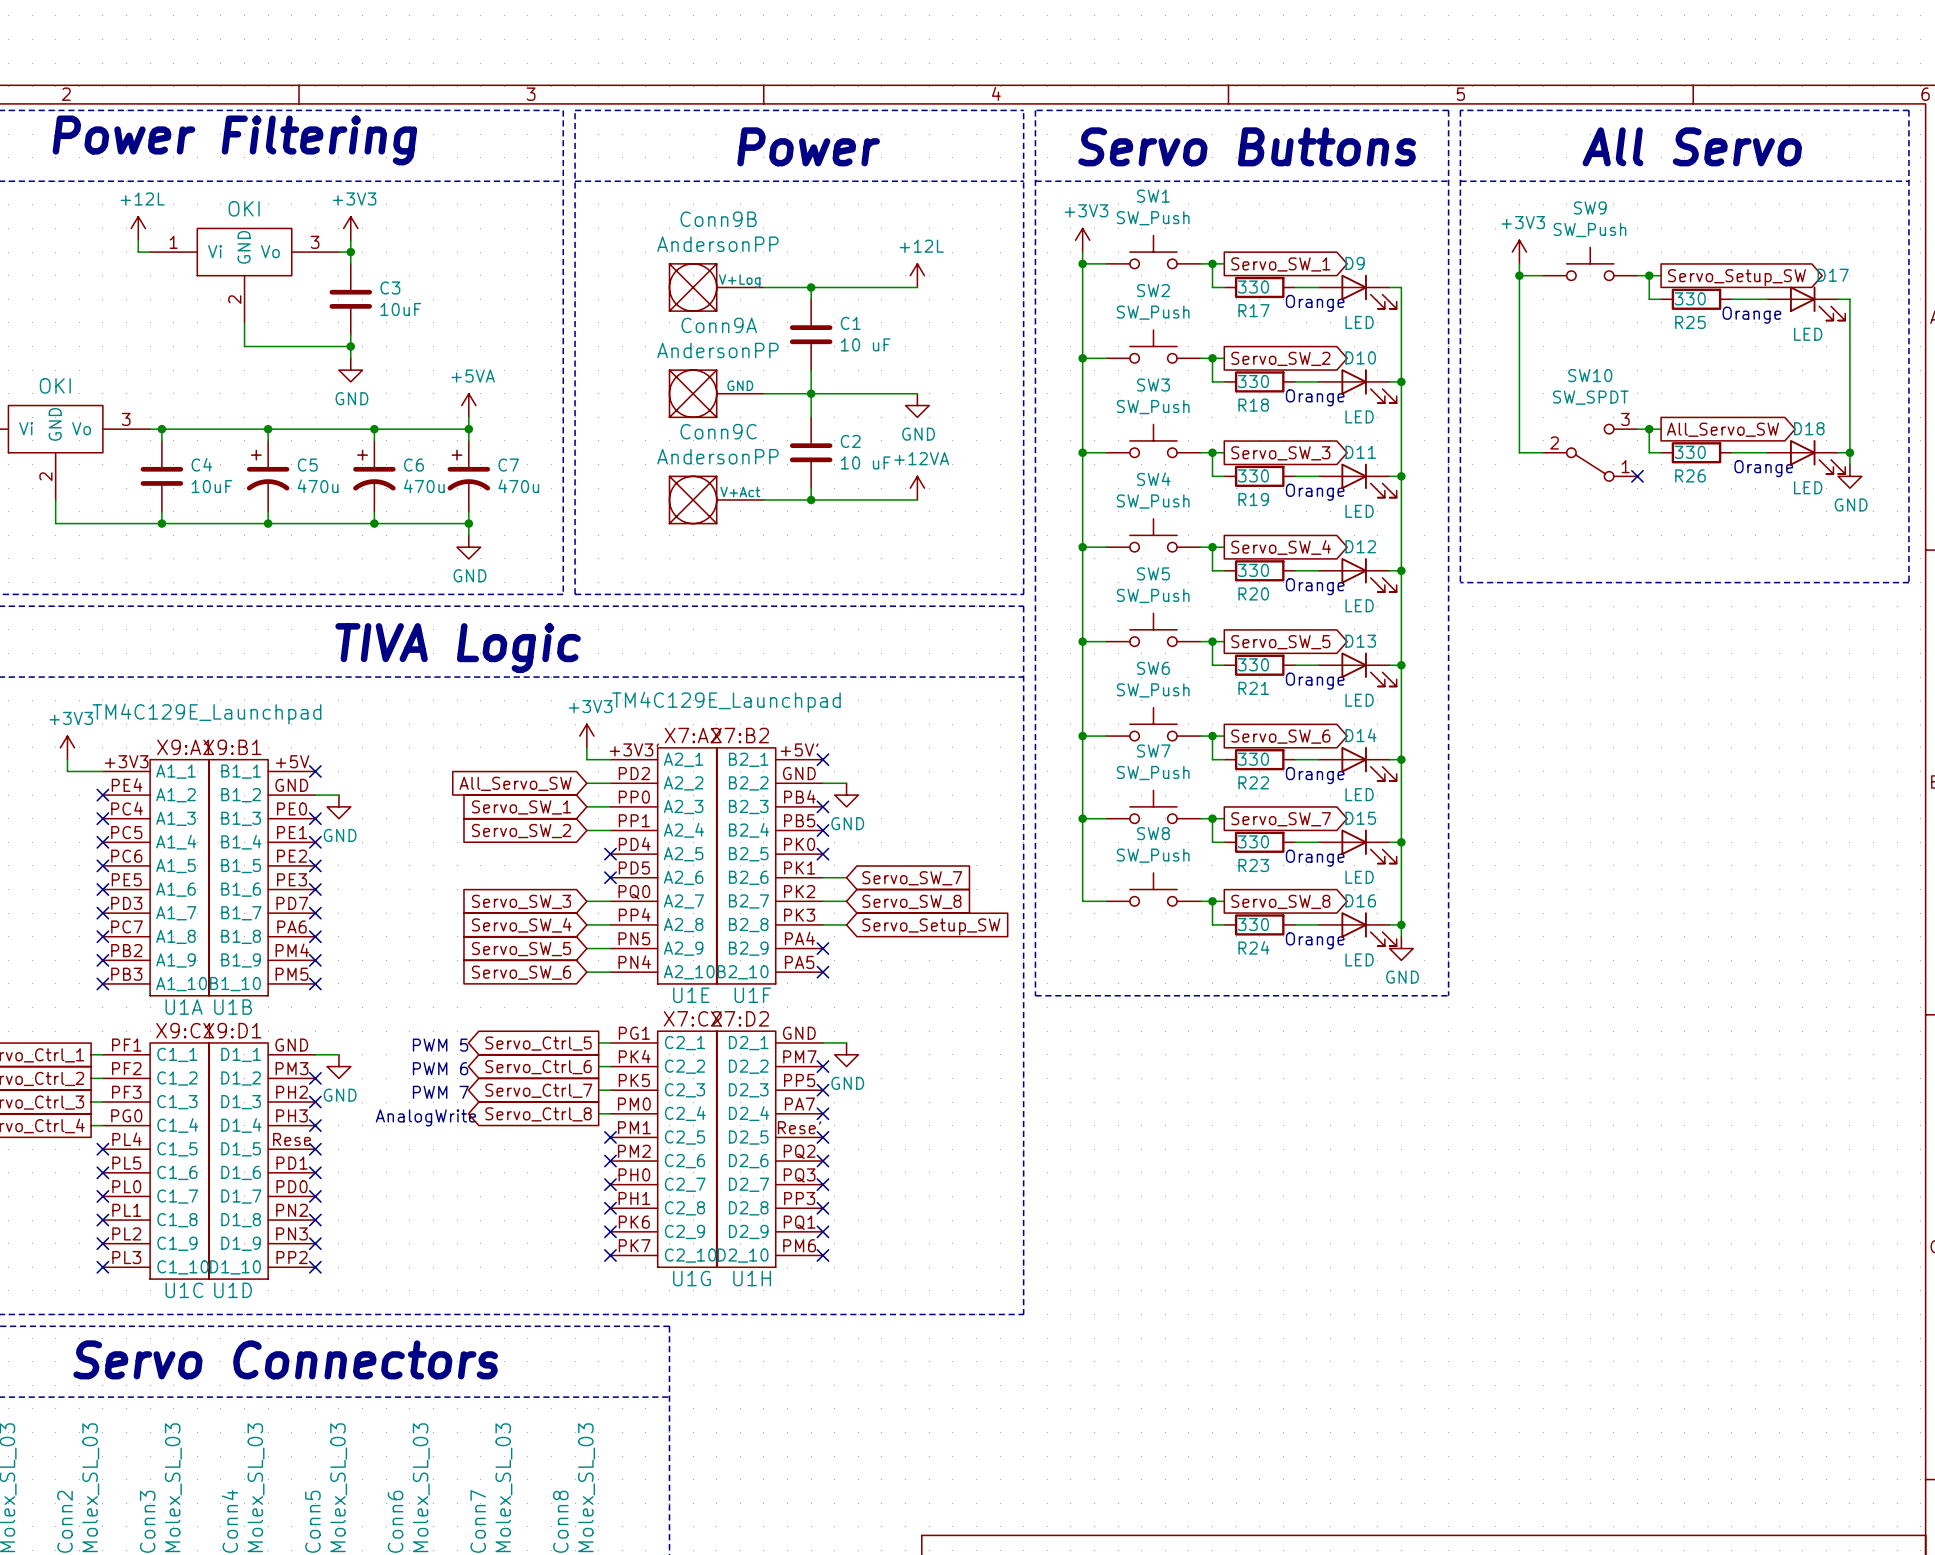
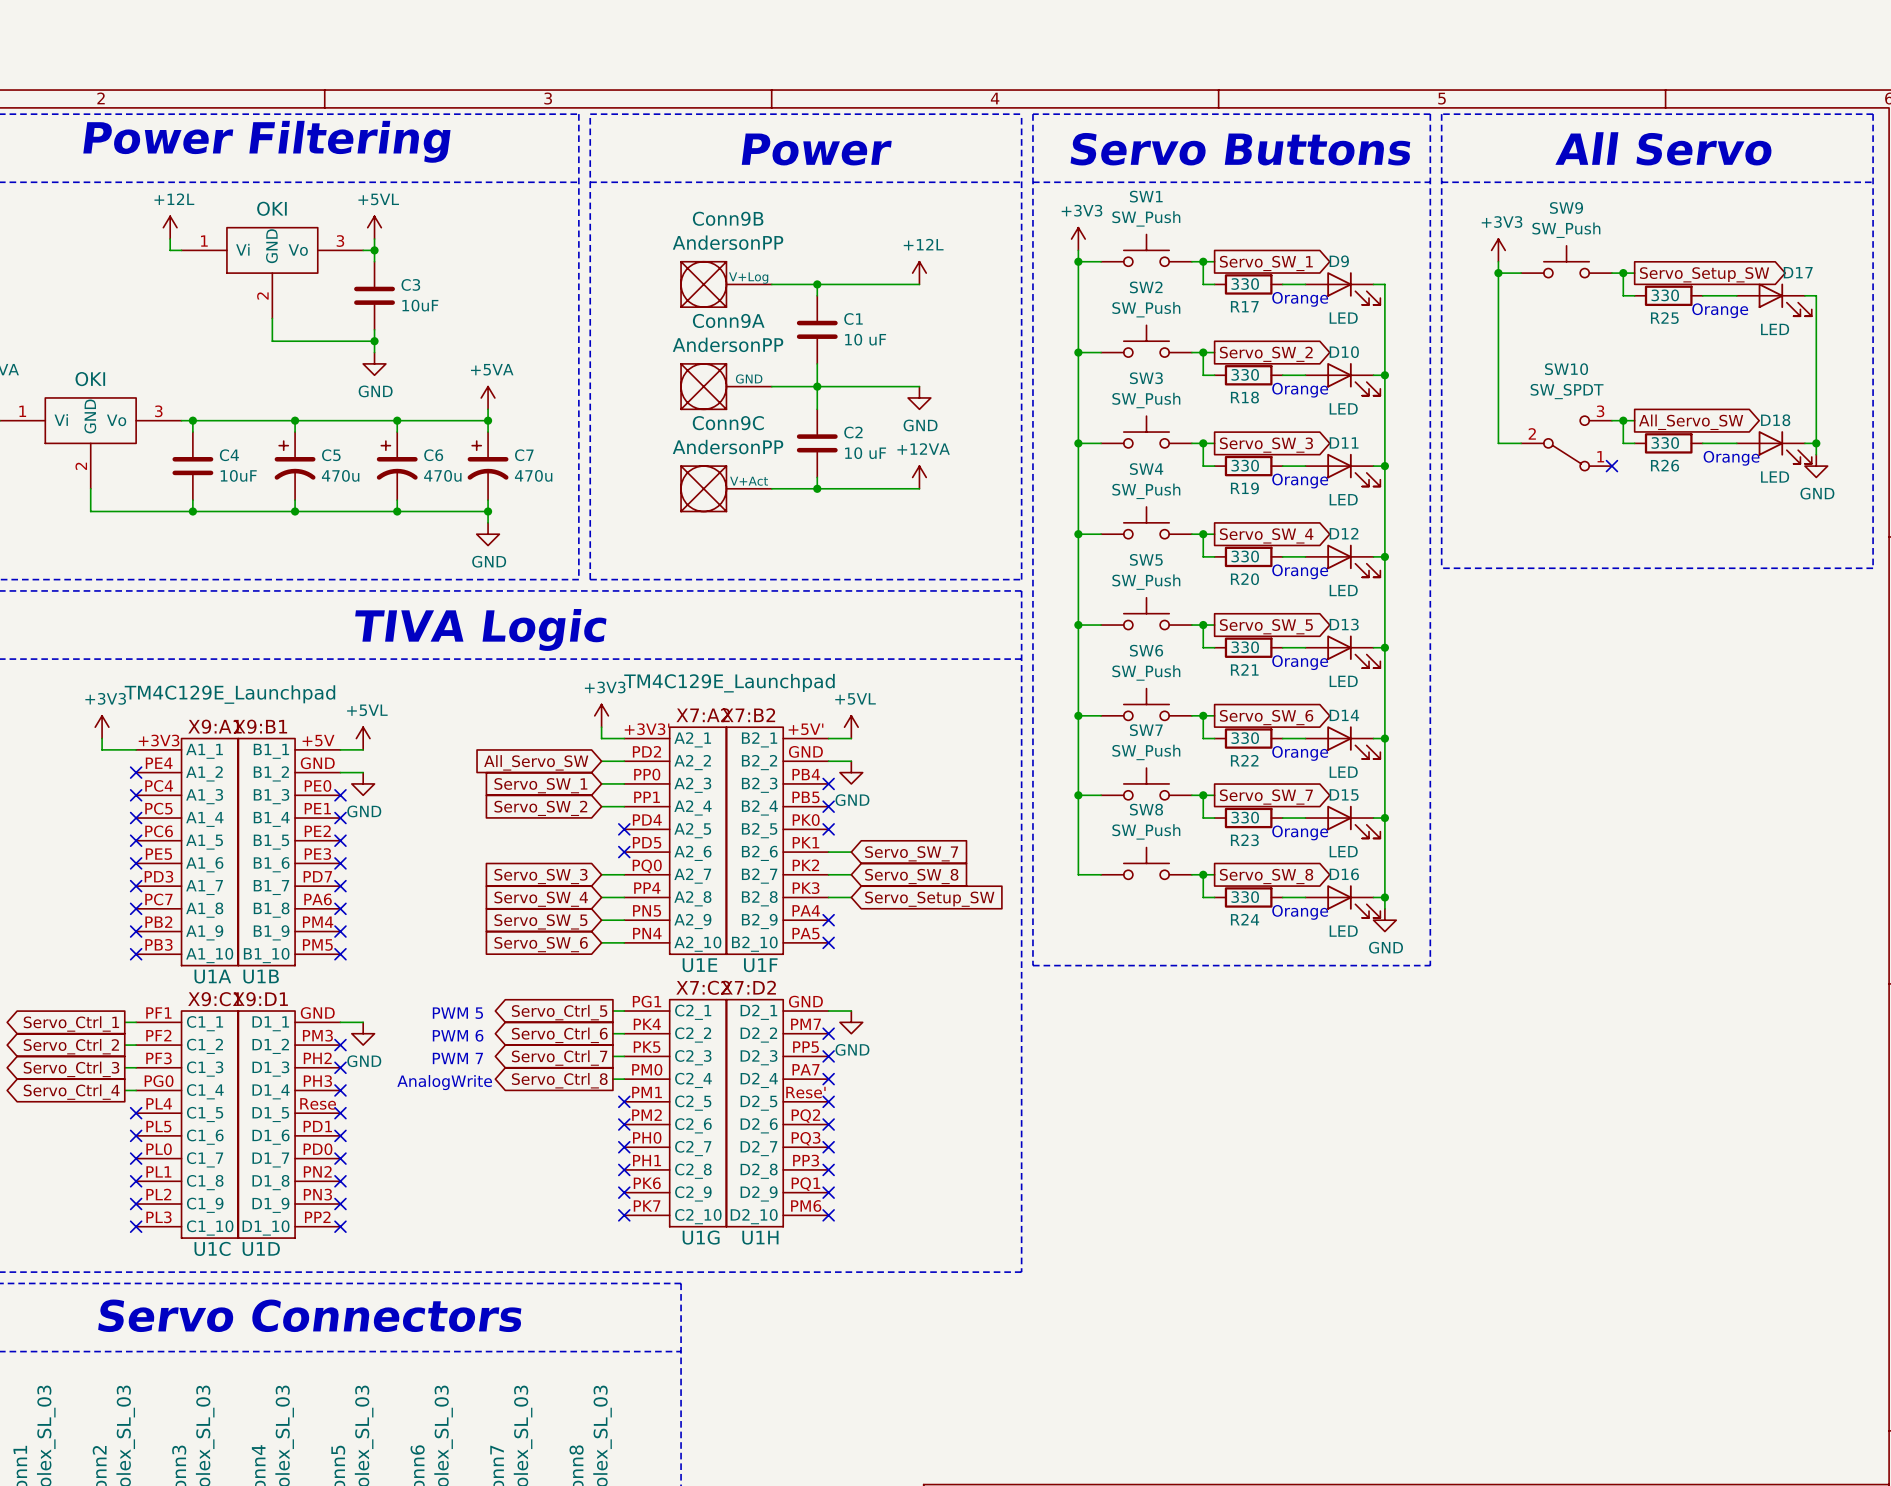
power symbol: +3V3 (350, 228) -> +5VL (374, 227)
power symbol: none -> +5VL (851, 727)
power symbol: none -> +5VL (363, 738)
wire: none -> (828, 738) (851, 738)
no-connect mark: (822, 759) -> none
wire: none -> (340, 749) (363, 749)
no-connect mark: (315, 771) -> none

